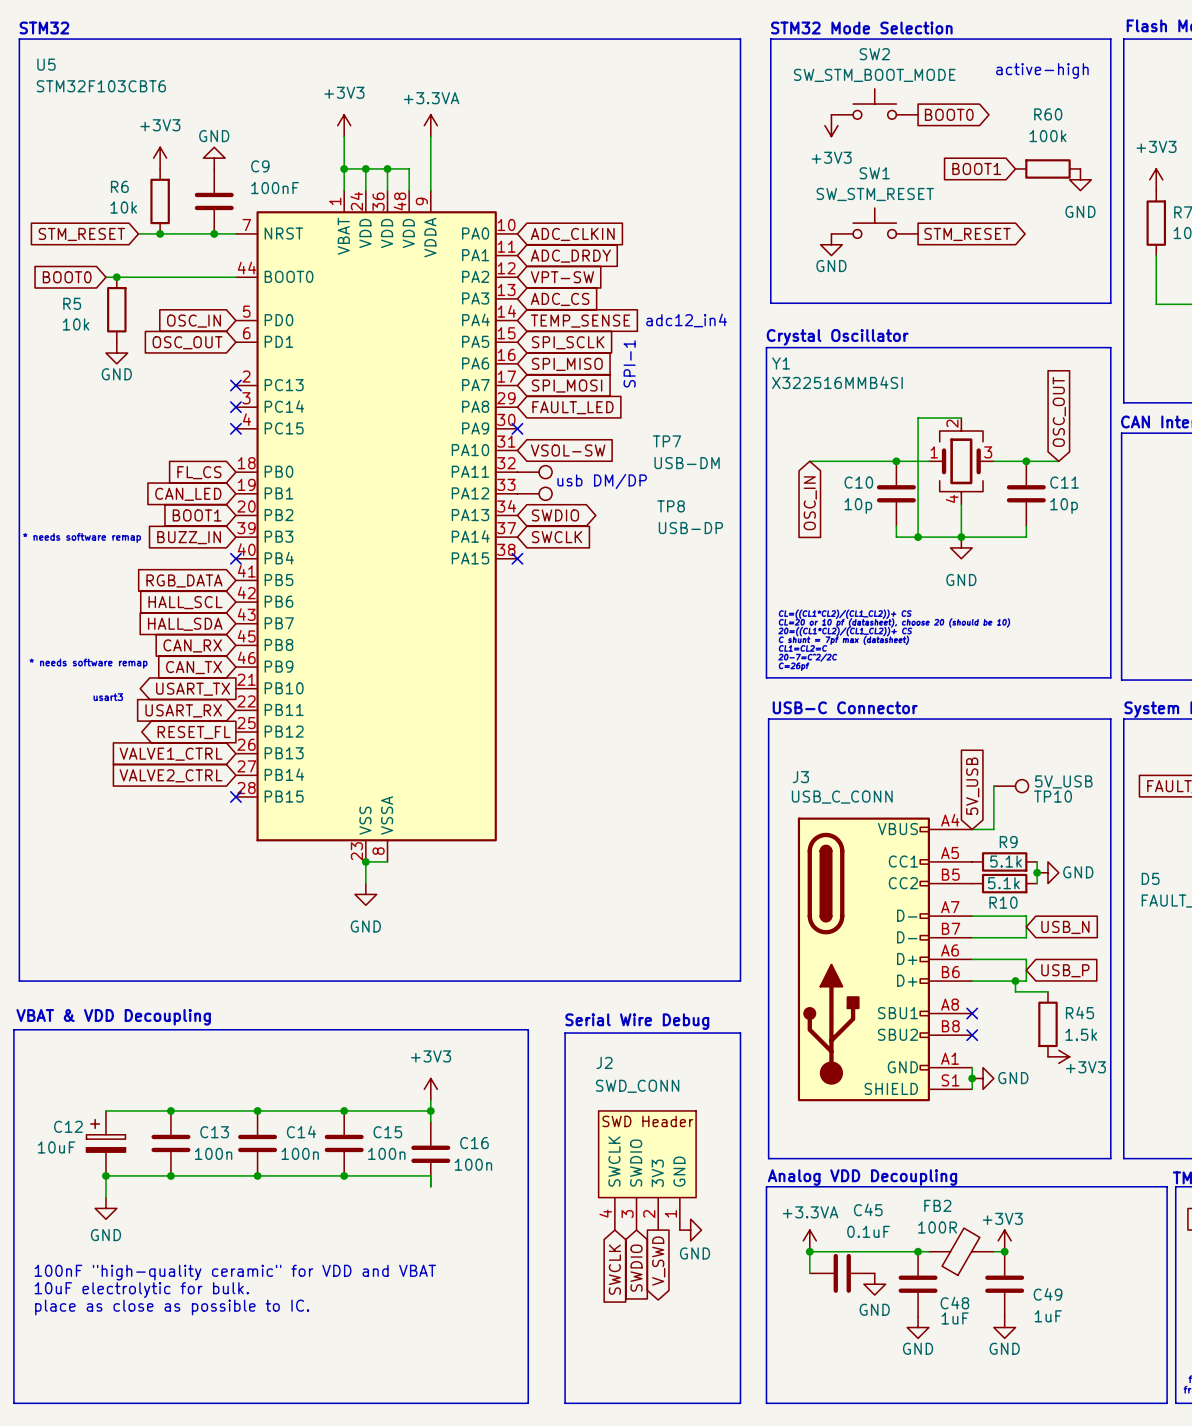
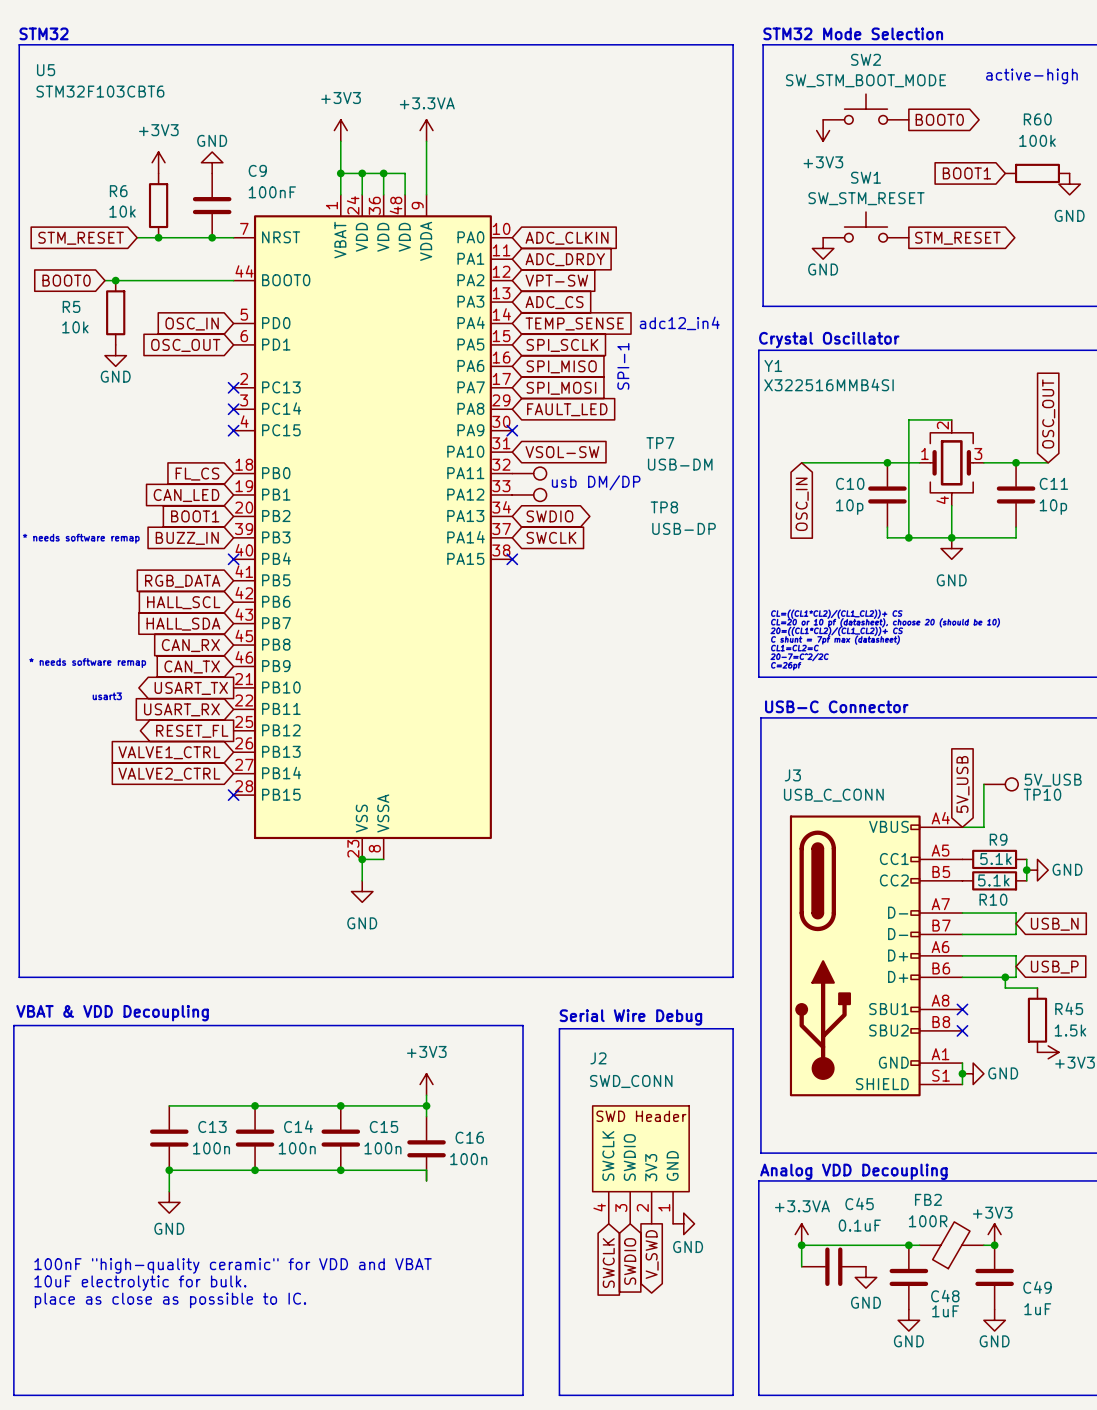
wire: (105, 1110) (170, 1110) -> none
junction: (170, 1110) -> none
C12: 10uF (105, 1143) -> none
junction: (105, 1175) -> none
wire: (170, 1175) (105, 1175) (105, 1197) -> (169, 1170) (169, 1191)
power symbol position: GND (105, 1208) -> GND (169, 1202)

